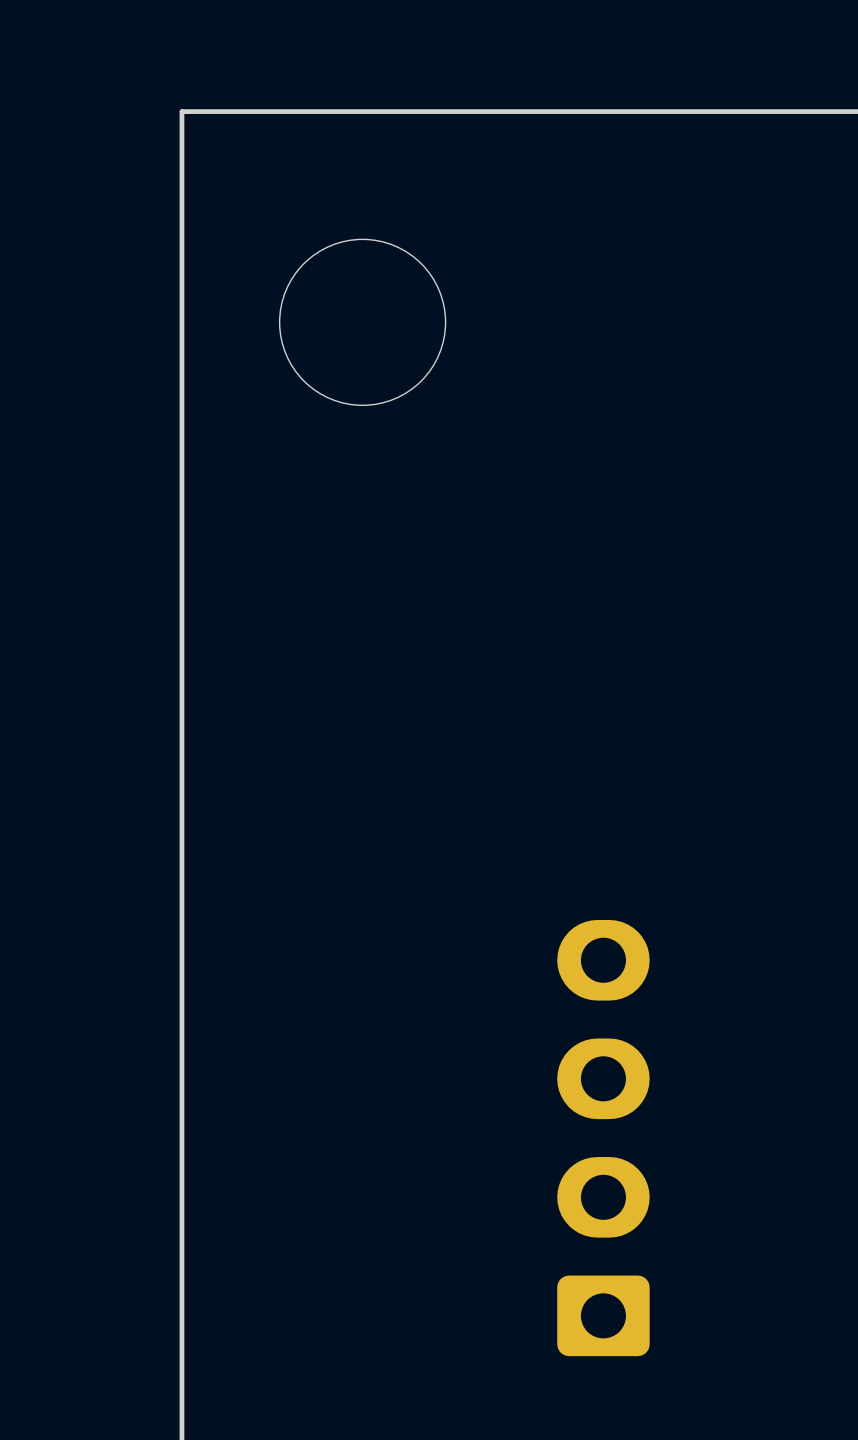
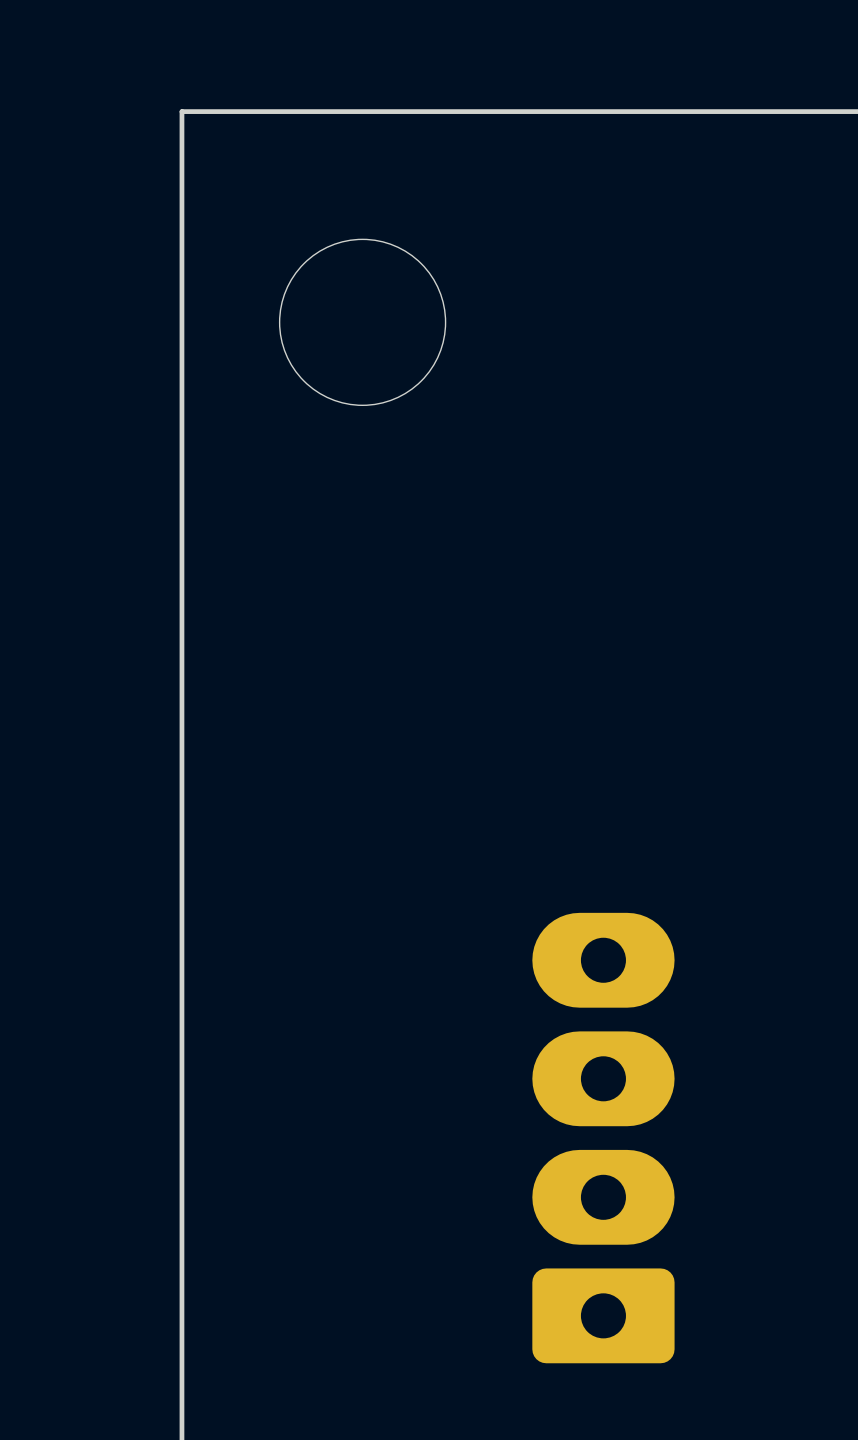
part footprint: [557, 919, 650, 1357] -> [532, 912, 675, 1364]

